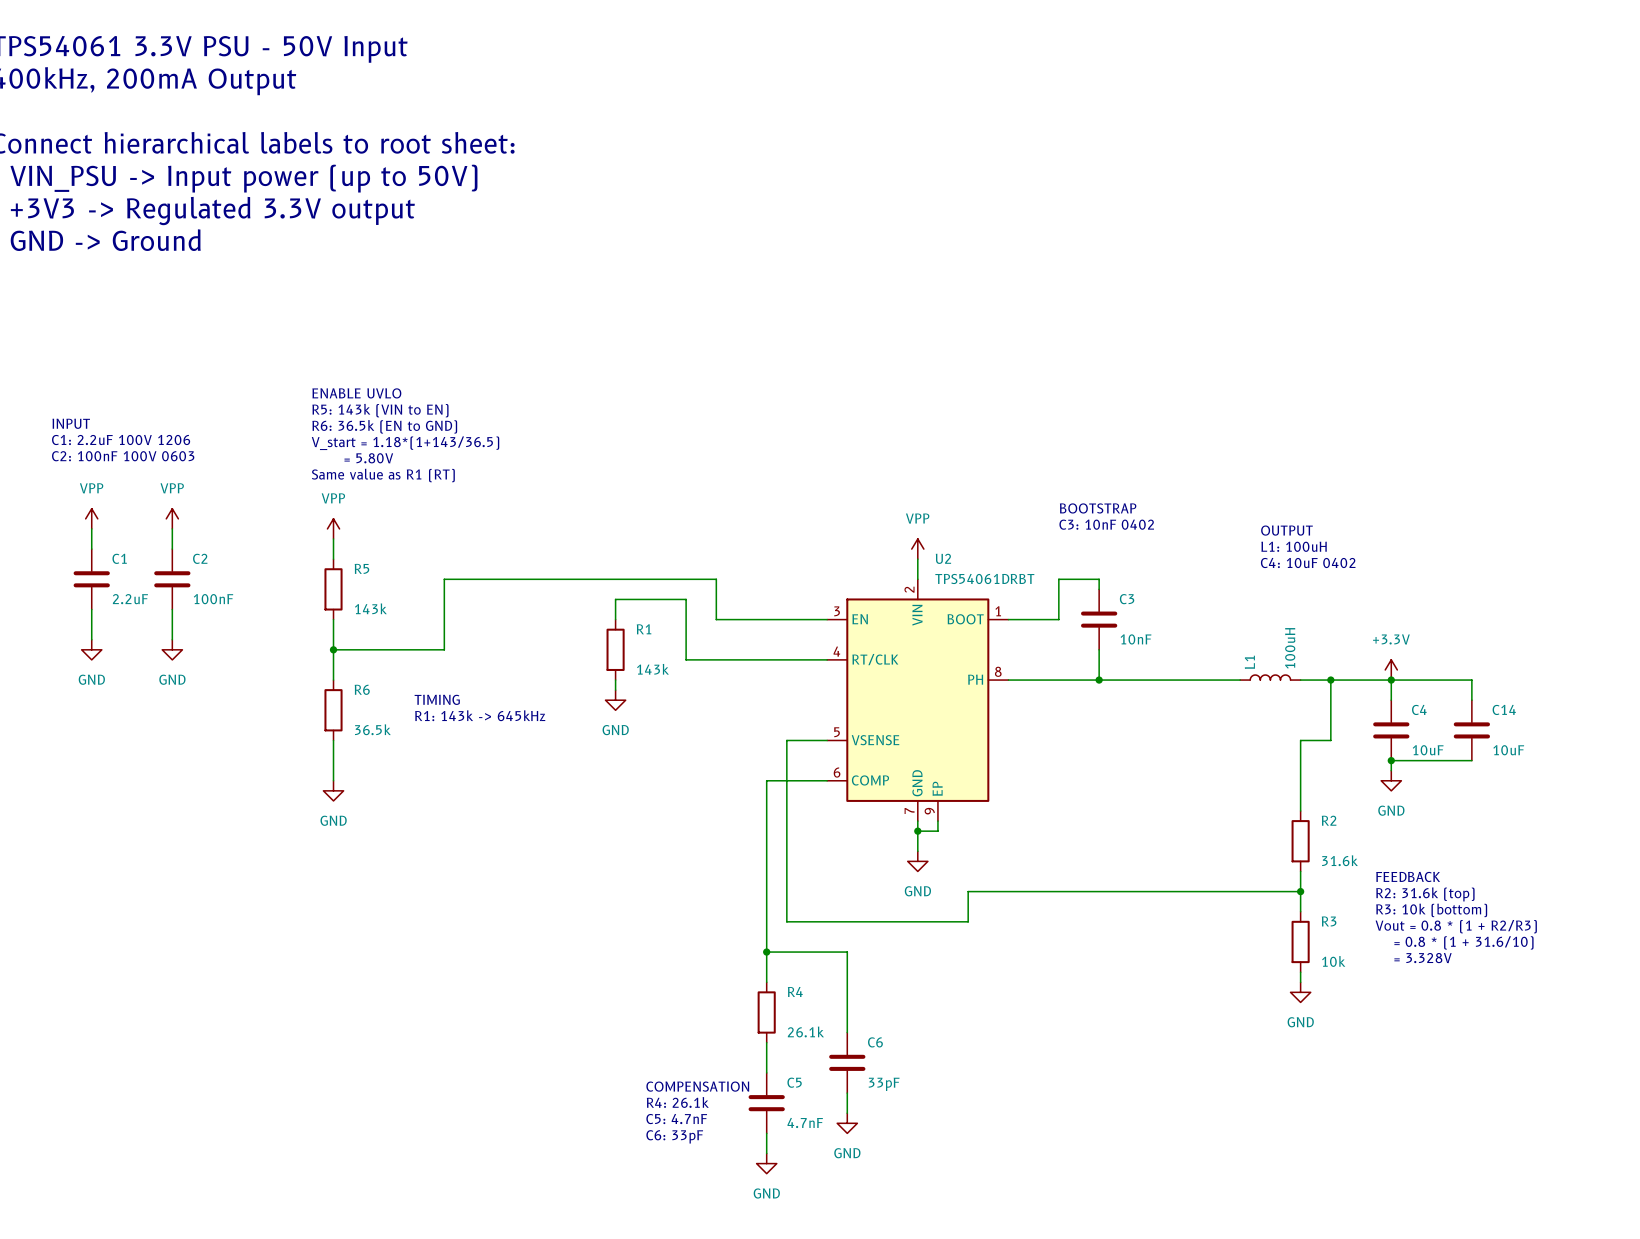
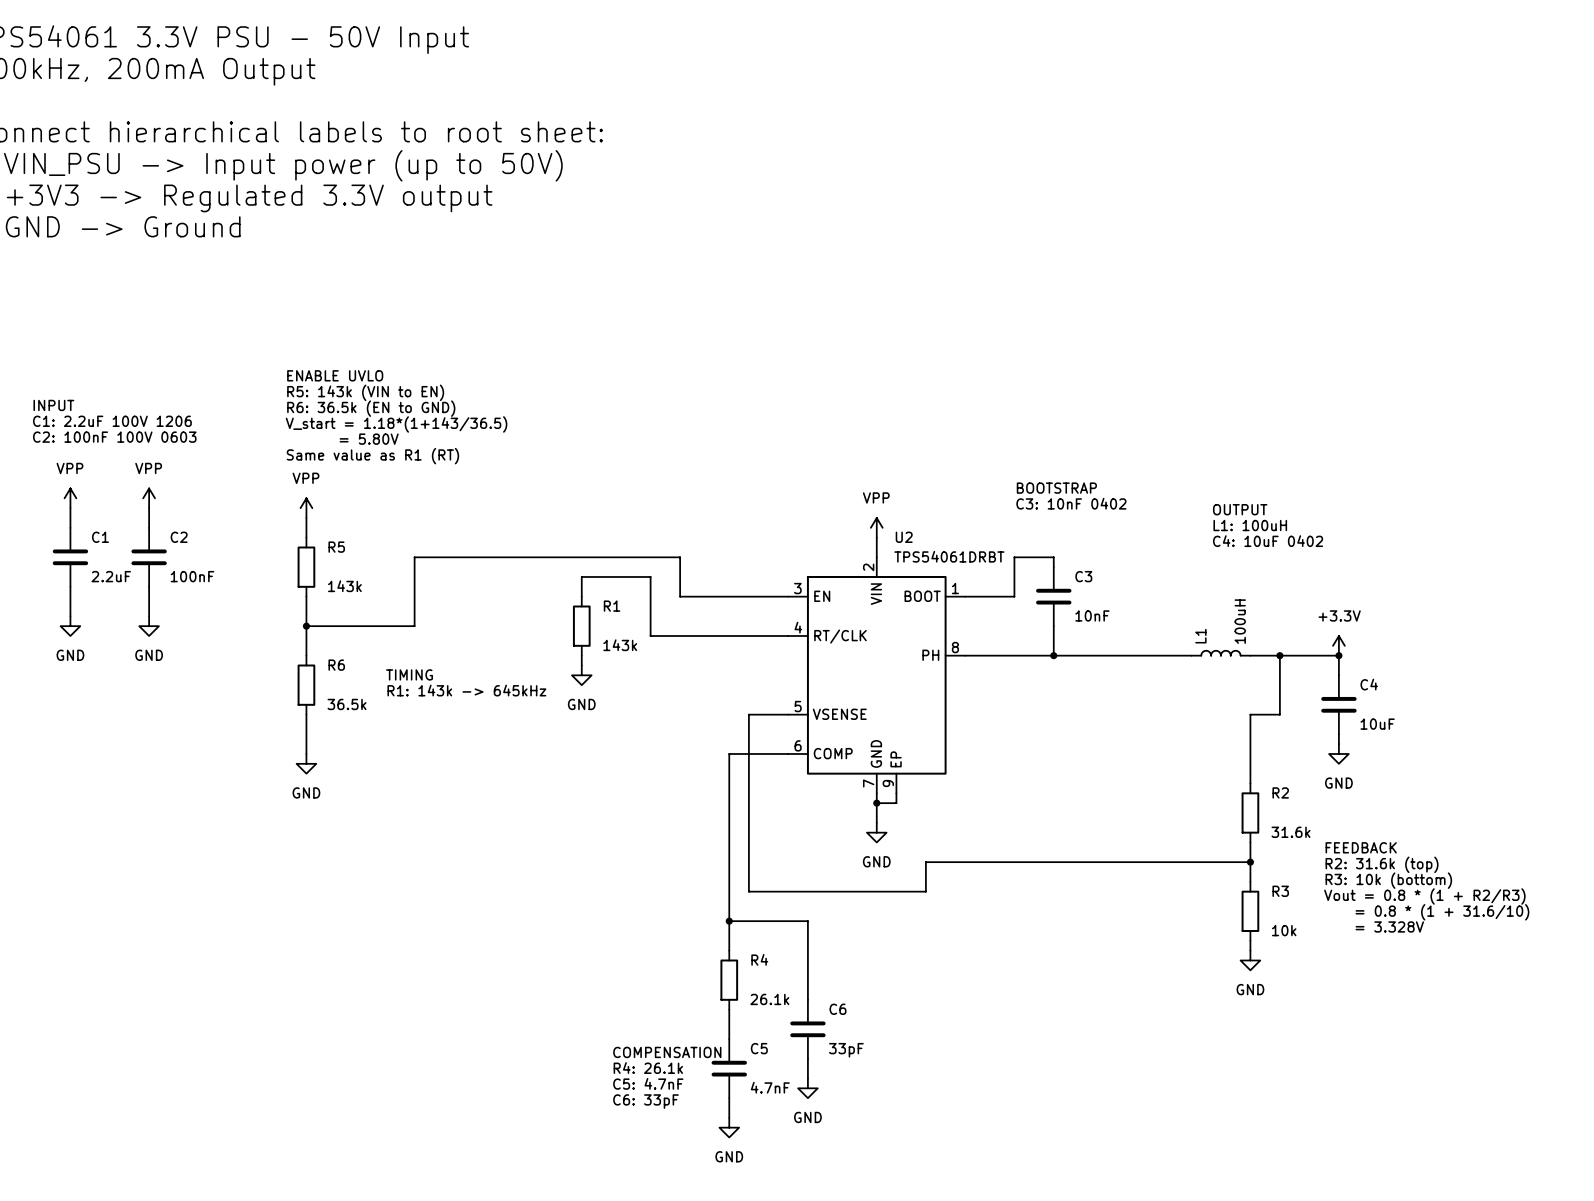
wire: (1391, 680) (1471, 680) (1471, 700) -> none
C14: 10uF (1471, 730) -> none
wire: (1391, 760) (1471, 760) -> none
junction: (1391, 760) -> none

